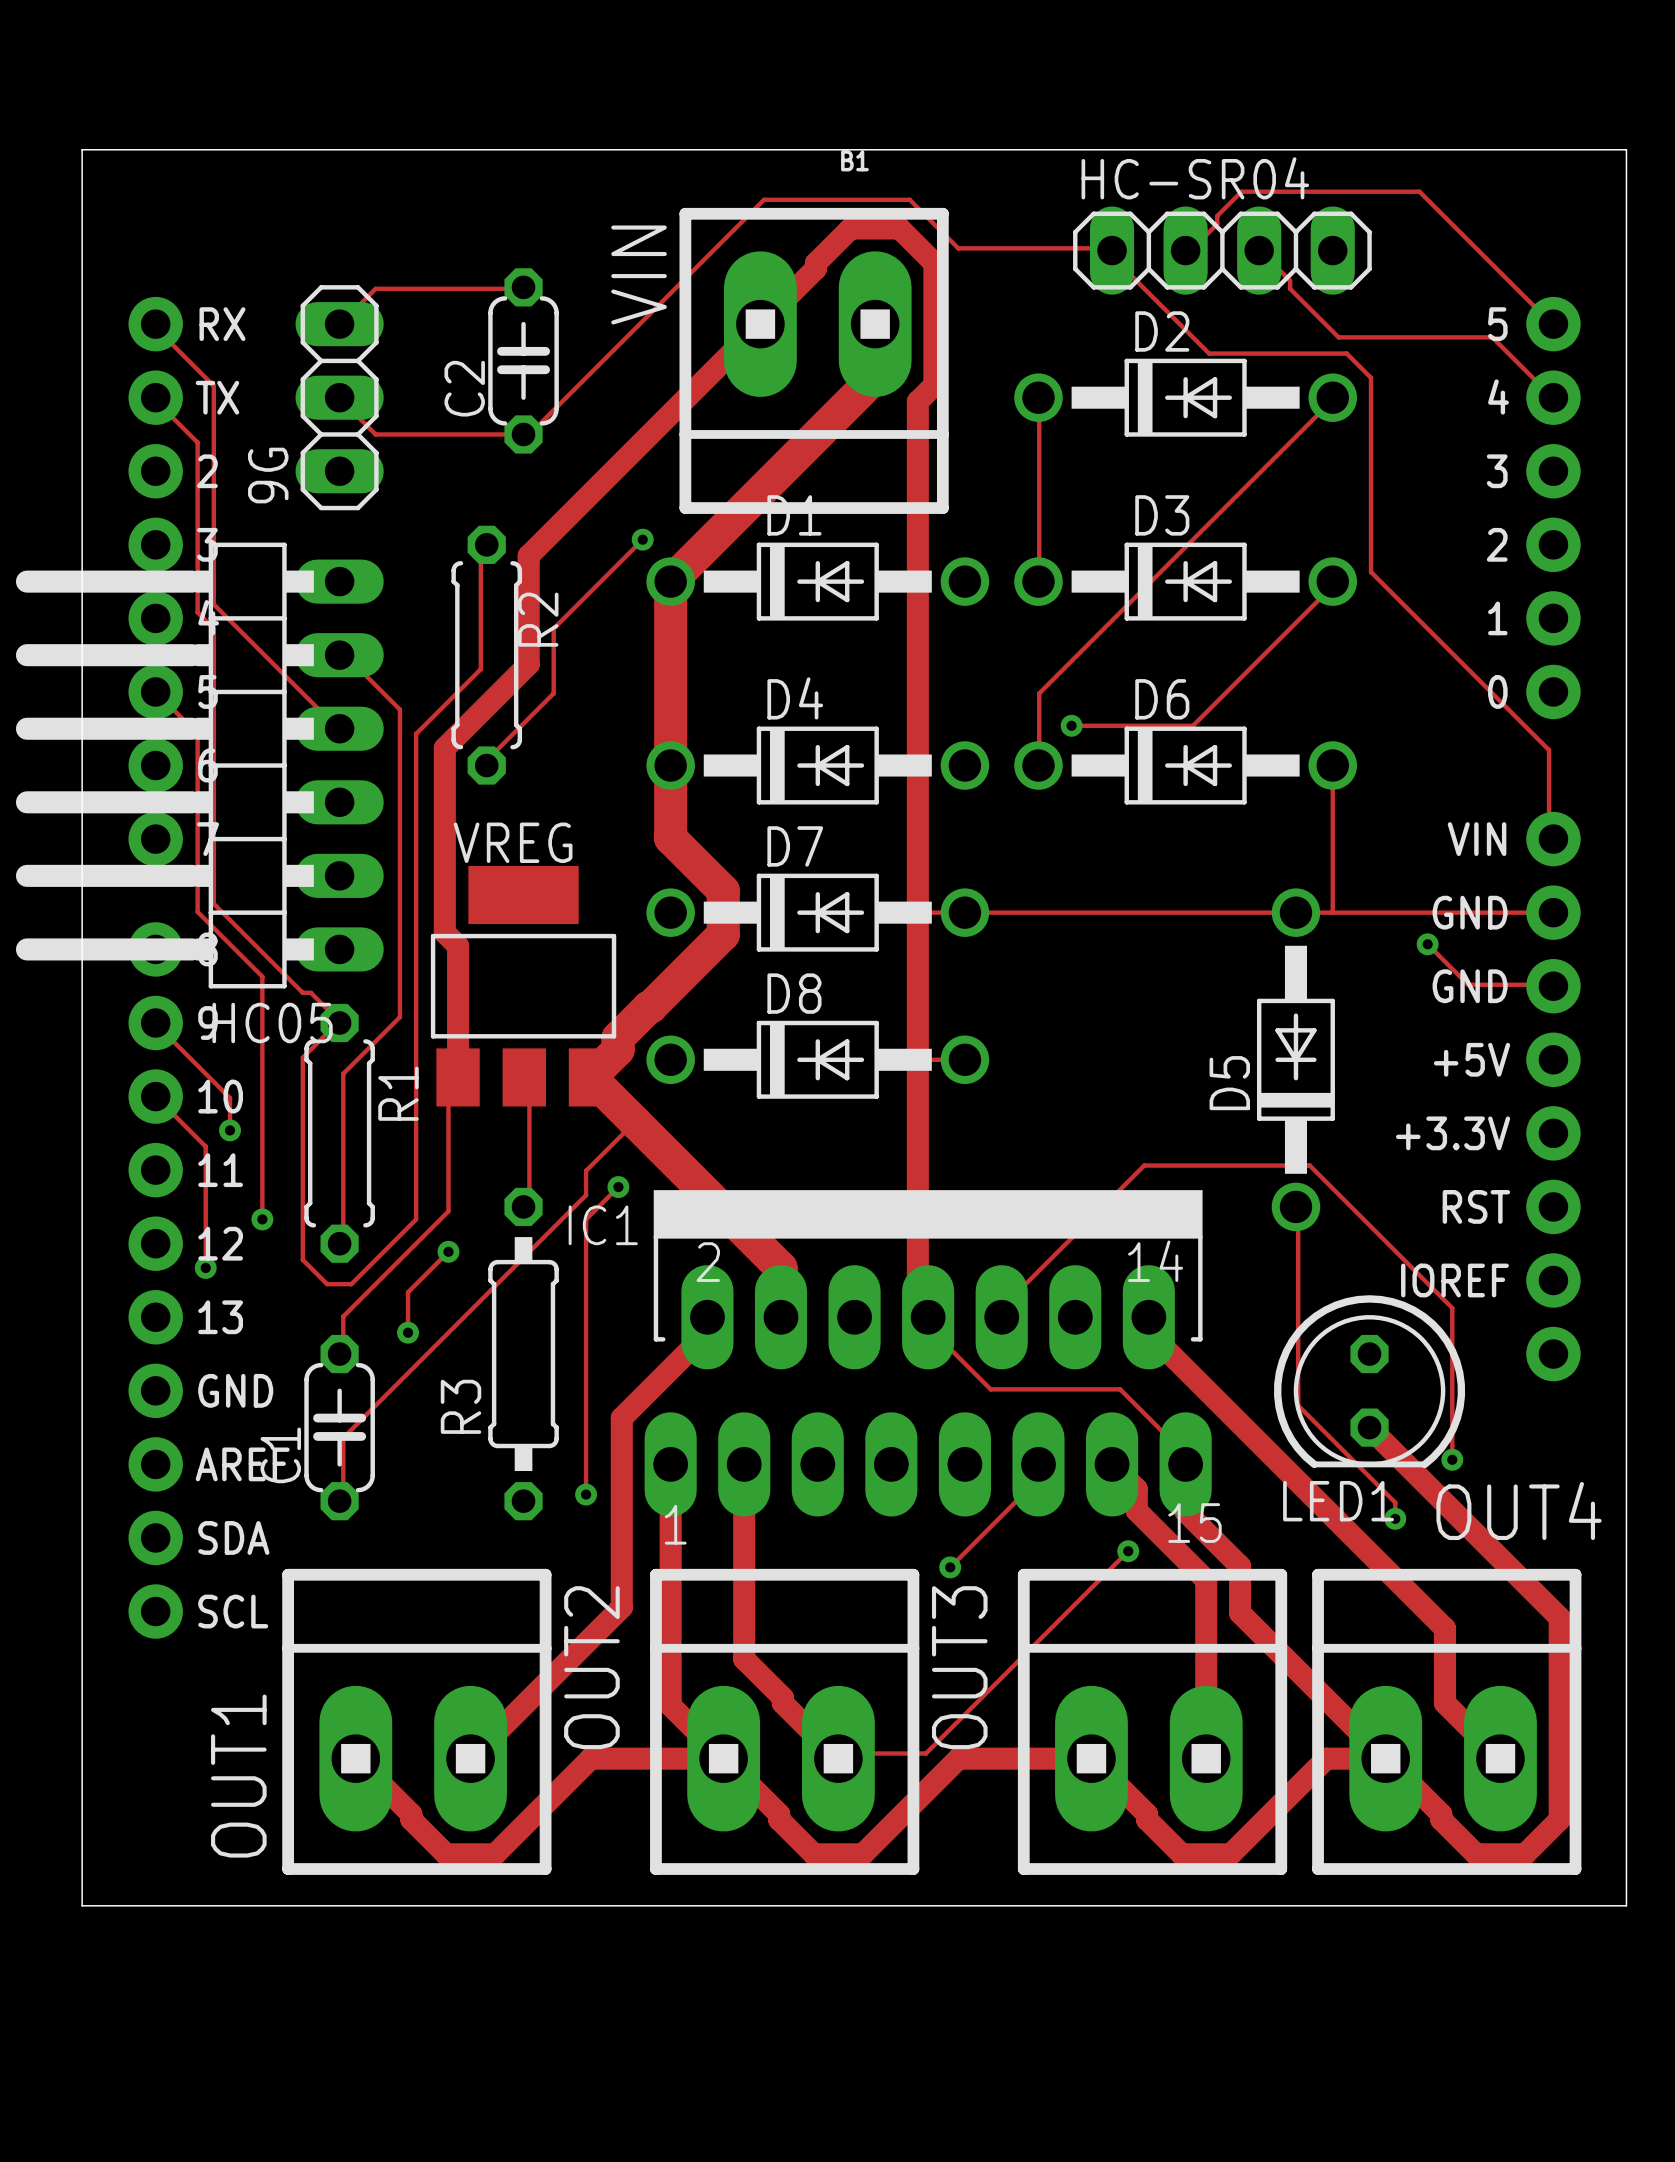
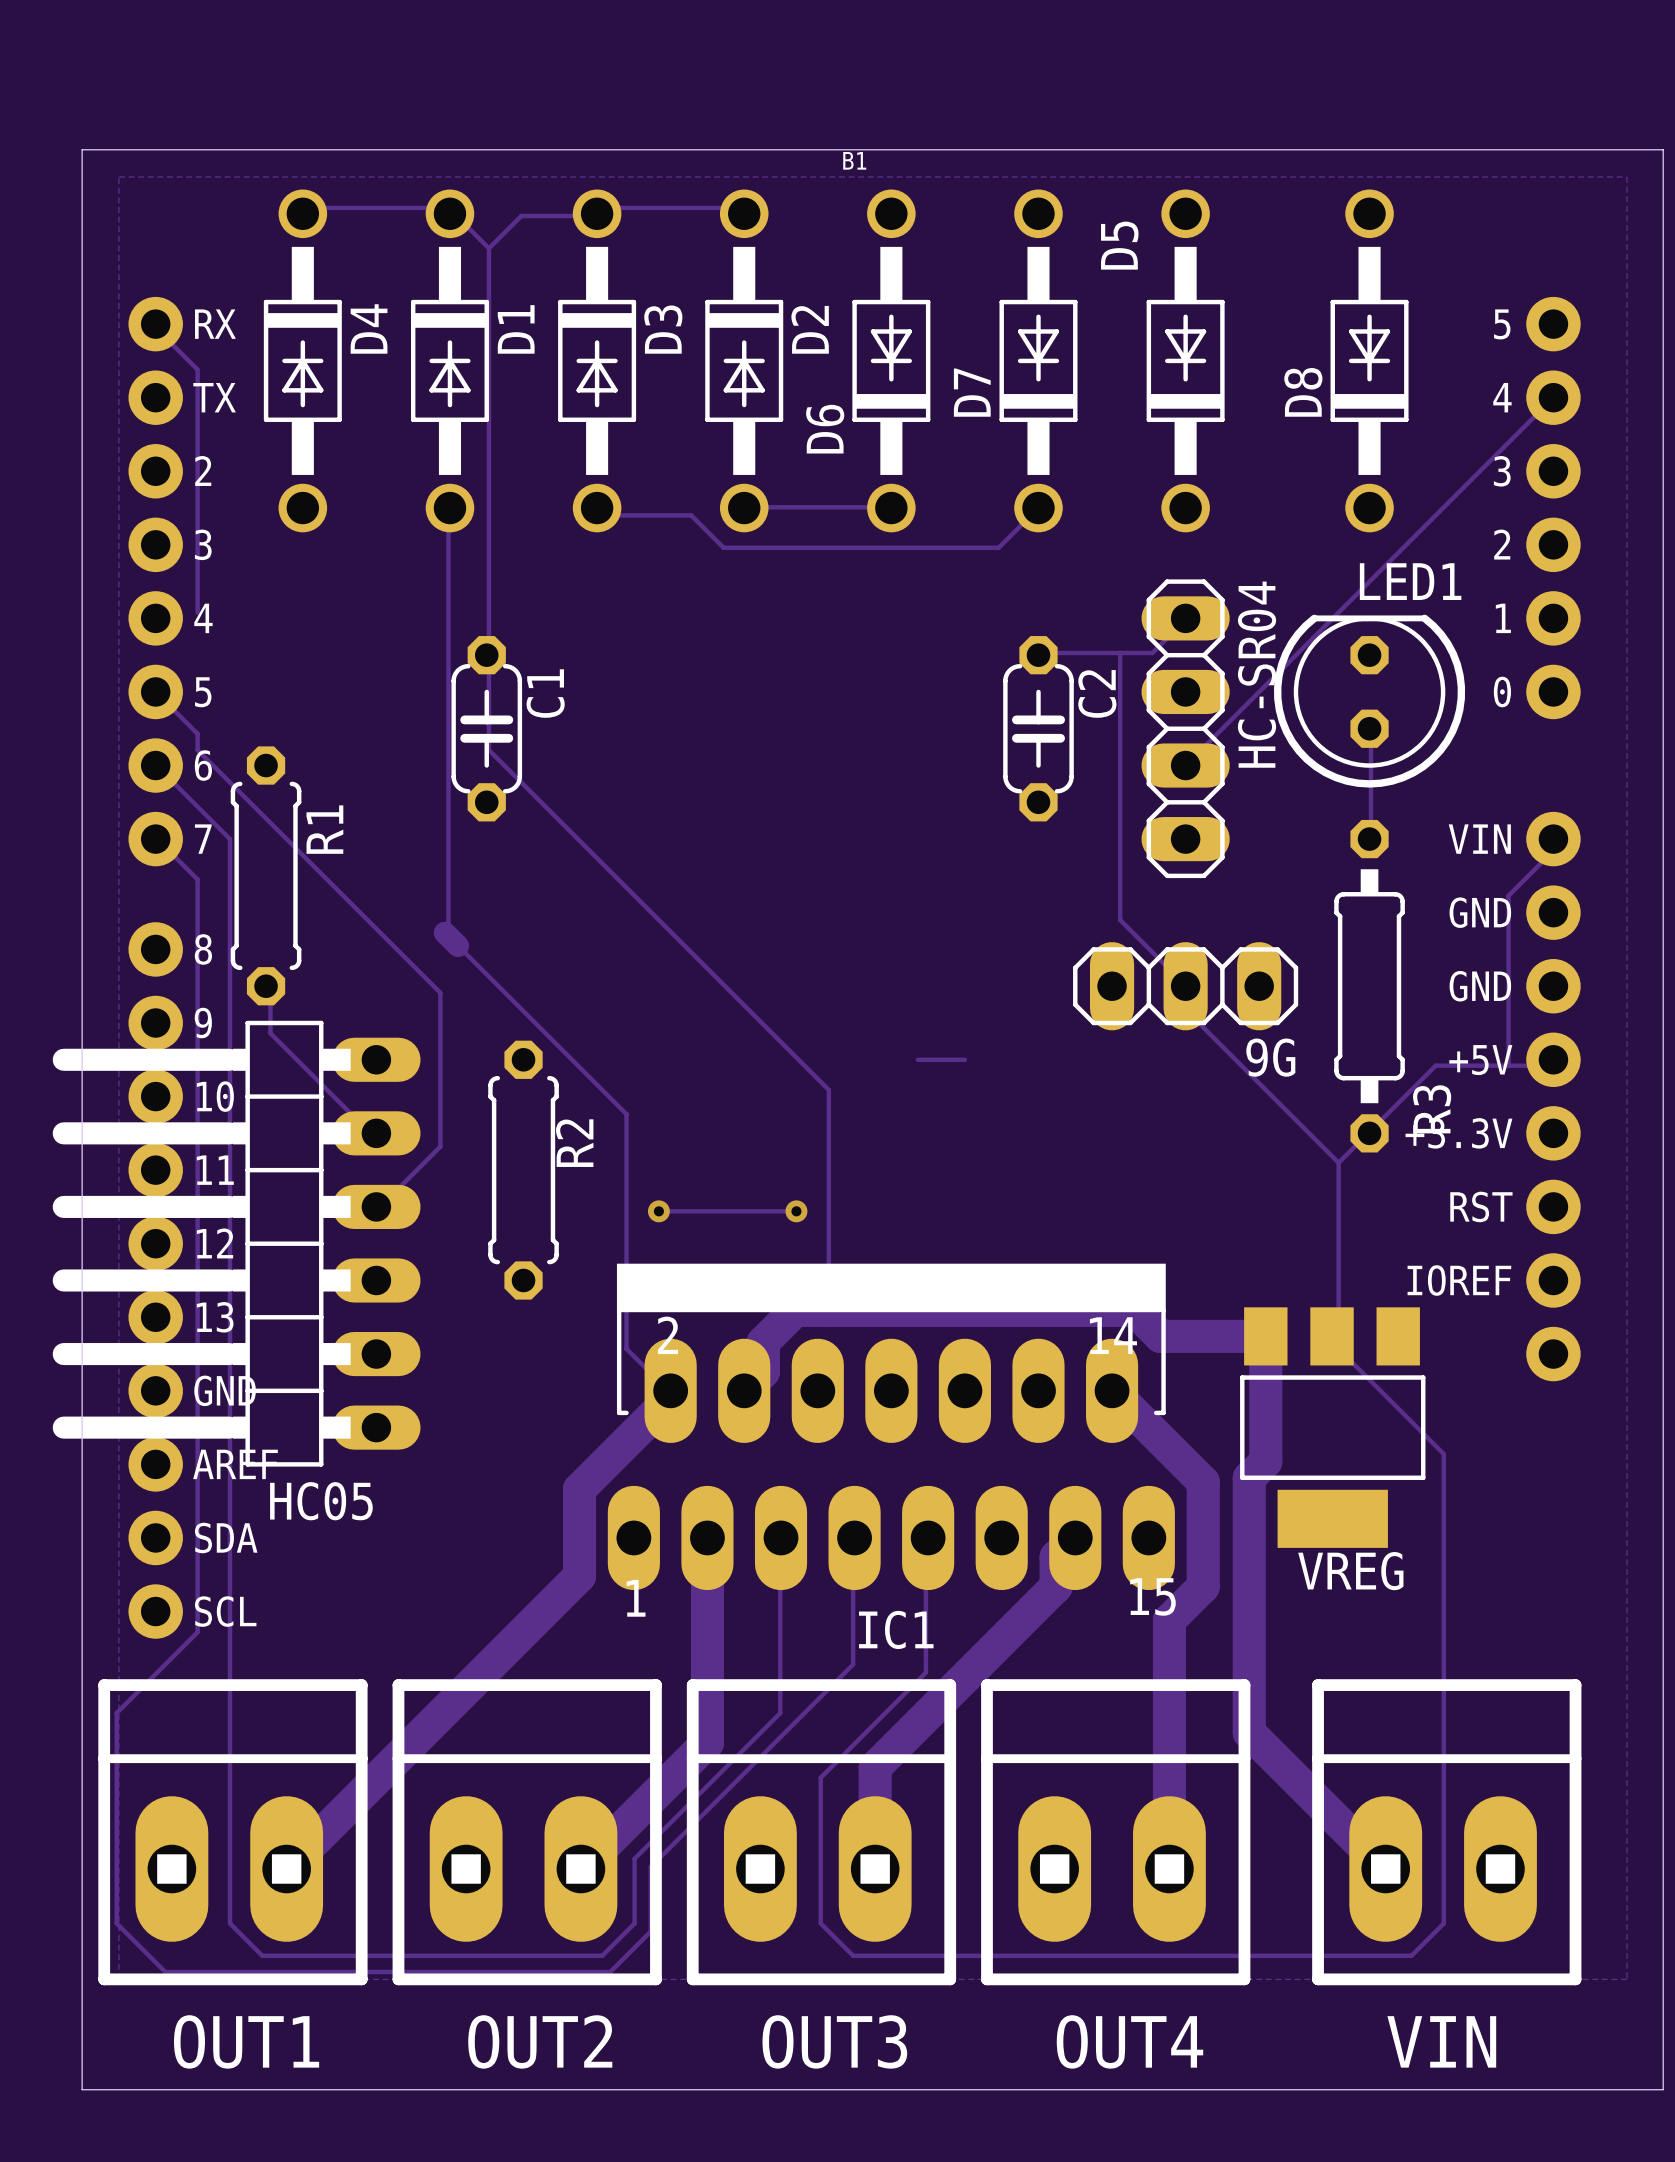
board edge: (1626, 149) (1626, 1905) (82, 1905) -> (1626, 149) (1663, 149) (1663, 2089) (82, 2089) (82, 1905)
zone outline: none -> (118, 177) (1627, 177) (1627, 1979) (118, 1979) (118, 177)
track: none -> (302, 213) (302, 207) (448, 207) (449, 213) (456, 215) (488, 248)
track: none -> (744, 213) (739, 207) (602, 207) (594, 215) (521, 215) (488, 248)
track: none -> (488, 248) (488, 652) (486, 655) (488, 661) (488, 750) (828, 1089) (828, 1310)
track: (1185, 250) (1192, 248) (1217, 224) (1217, 215) (1241, 191) (1419, 191) (1553, 324) -> none
HC-SR04 rotation: 0° (1222, 250) -> 90° clockwise (1185, 728)
HC-SR04 position: (1222, 250) -> (1185, 728)
track: (1259, 250) (1290, 280) (1290, 288) (1338, 337) (1492, 337) (1553, 397) -> (1185, 765) (1553, 397)
track: (523, 287) (375, 288) (339, 324) -> none
track: (875, 324) (875, 377) (670, 581) (670, 838) (723, 890) (723, 934) (618, 1038) (618, 1049) (590, 1077) (781, 1267) (781, 1317) -> none
C2 rotation: 0° (523, 360) -> 180° (1038, 728)
C2 position: (523, 360) -> (1038, 728)
VIN: (814, 360) -> none
track: (197, 369) (213, 385) (213, 604) (339, 728) -> none
track: (155, 397) (157, 402) (197, 442) -> (197, 369) (197, 442)
track: (339, 397) (375, 434) (529, 434) (764, 199) (909, 199) (958, 248) (1112, 248) (1112, 256) (1209, 353) (1346, 353) (1371, 377) (1371, 572) (1549, 750) (1549, 839) -> (1508, 1065) (1508, 895) (1549, 855) (1549, 839)
9G rotation: 0° (339, 397) -> 90° clockwise (1185, 986)
9G position: (339, 397) -> (1185, 986)
track: (1038, 397) (1038, 581) -> none
D2 rotation: 0° (1185, 397) -> 90° clockwise (744, 360)
D2 position: (1185, 397) -> (744, 360)
track: (1332, 397) (1330, 402) (1039, 693) (1038, 765) -> none
9G name position: 9G (268, 475) -> 9G (1270, 1057)
track: none -> (449, 508) (448, 936) (626, 1114) (626, 1348) (670, 1390) (670, 1398) (579, 1489) (579, 1576) (286, 1869)
track: none -> (597, 508) (602, 515) (691, 515) (723, 547) (998, 547) (1038, 508)
track: none -> (744, 508) (891, 508)
track: (642, 539) (553, 628) (553, 693) (488, 758) (486, 765) -> none
via: (642, 539) -> none
track: (486, 544) (480, 547) (480, 669) (416, 733) (416, 1219) (351, 1284) (327, 1284) (302, 1259) (302, 1057) (339, 1023) (310, 992) (302, 992) (213, 903) (213, 628) (197, 612) -> none
D1 rotation: 0° (817, 581) -> 90° clockwise (449, 360)
D1 position: (817, 581) -> (449, 360)
D3 rotation: 0° (1185, 581) -> 90° clockwise (597, 360)
D3 position: (1185, 581) -> (597, 360)
track: (1332, 581) (1330, 588) (1192, 725) (1071, 725) -> none
track: none -> (1185, 618) (1152, 652) (1039, 652) (1038, 655)
track: none -> (1120, 652) (1120, 920) (1192, 992) (1192, 1017) (1338, 1162)
track: (339, 655) (343, 652) (399, 709) (399, 1017) (343, 1073) (343, 1243) (339, 1243) -> none
R2 position: (486, 655) -> (523, 1170)
via: (1071, 725) -> none
track: none -> (1369, 728) (1369, 839)
track: (197, 750) (197, 879) -> (155, 839) (197, 879)
track: none -> (197, 750) (440, 992) (440, 1146) (383, 1203) (376, 1206)
HC05 position: (199, 765) -> (236, 1243)
D4 rotation: 0° (817, 765) -> 90° clockwise (302, 360)
D4 position: (817, 765) -> (302, 360)
D6 rotation: 0° (1185, 765) -> 90° counterclockwise (891, 360)
D6 position: (1185, 765) -> (891, 360)
track: (1332, 765) (1332, 912) -> none
track: (197, 911) (262, 976) (262, 1219) -> (197, 911) (197, 1632) (116, 1713) (116, 1923) (165, 1972) (610, 1972) (650, 1931) (650, 1866) (853, 1664) (854, 1537)
D7 rotation: 0° (817, 912) -> 90° counterclockwise (1038, 360)
D7 position: (817, 912) -> (1038, 360)
track: (917, 912) (1553, 912) -> none
track: (444, 932) (444, 748) (528, 664) (528, 555) (815, 268) (815, 263) (850, 228) (899, 228) (934, 263) (934, 385) (917, 401) (917, 1306) (928, 1317) (925, 1324) (990, 1389) (1120, 1389) (1184, 1454) (1185, 1511) (1240, 1566) (1240, 1613) (1441, 1814) (1441, 1819) (1475, 1854) (1525, 1854) (1559, 1819) (1559, 1617) (1369, 1427) -> none
track: (1427, 944) (1468, 984) (1553, 986) -> none
via: (1427, 944) -> none
track: (458, 946) (458, 1077) (448, 1081) (448, 1211) (343, 1316) (343, 1348) (339, 1354) -> none
track: none -> (266, 986) (270, 992) (270, 1033) (375, 1138) (376, 1133)
VREG: (523, 986) -> none
track: (155, 1023) (230, 1098) -> (155, 765) (230, 839) (230, 1098)
D8 rotation: 0° (817, 1059) -> 90° counterclockwise (1369, 360)
D8 position: (817, 1059) -> (1369, 360)
D5 position: (1295, 1059) -> (1185, 360)
track: none -> (1553, 1059) (1549, 1065) (1435, 1065) (1338, 1162)
track: (524, 1077) (529, 1081) (529, 1203) (523, 1206) -> none
D5 name position: D5 (1229, 1083) -> D5 (1119, 245)
track: (155, 1096) (205, 1146) (205, 1267) -> none
track: (634, 1121) (586, 1170) (586, 1195) (343, 1437) (343, 1494) (339, 1501) -> none
track: none -> (230, 1130) (230, 1923) (262, 1955) (602, 1955) (634, 1923) (634, 1858) (780, 1713) (781, 1537)
via: (230, 1130) -> none
R1 position: (339, 1133) -> (266, 875)
track: none -> (1338, 1162) (1338, 1332) (1332, 1336) (1330, 1340) (1443, 1454) (1443, 1923) (1411, 1955) (853, 1955) (820, 1923) (820, 1777) (925, 1672) (925, 1543) (928, 1537)
track: (618, 1187) (586, 1219) (586, 1494) -> none
via position: (618, 1187) -> (658, 1211)
track: (1295, 1206) (1298, 1211) (1298, 1405) (1395, 1502) (1395, 1518) -> none
track: none -> (658, 1211) (796, 1211)
via: none -> (796, 1211)
via: (262, 1219) -> none
IC1 name position: IC1 (603, 1225) -> IC1 (896, 1629)
track: (448, 1251) (408, 1292) (408, 1332) -> none
via: (448, 1251) -> none
via: (205, 1267) -> none
track: (707, 1317) (707, 1332) (621, 1418) (621, 1607) (470, 1758) -> none
track: (1001, 1317) (1001, 1308) (1144, 1165) (1309, 1165) (1452, 1308) (1452, 1459) -> none
track: (1148, 1317) (1148, 1332) (1444, 1628) (1444, 1703) (1500, 1758) -> none
via: (408, 1332) -> none
IC1 position: (928, 1353) -> (891, 1426)
R3 position: (523, 1354) -> (1369, 986)
LED1 rotation: 0° (1369, 1381) -> 180° (1369, 701)
LED1 position: (1369, 1381) -> (1369, 701)
track: none -> (744, 1390) (763, 1371) (763, 1342) (795, 1310) (1134, 1310) (1160, 1336) (1265, 1336) (1265, 1461) (1249, 1478) (1249, 1732) (1385, 1869)
track: none -> (1112, 1390) (1203, 1482) (1203, 1586) (1169, 1620) (1169, 1869)
R3 name position: R3 (461, 1406) -> R3 (1432, 1109)
C1 rotation: 0° (339, 1427) -> 180° (486, 728)
C1 position: (339, 1427) -> (486, 728)
VREG: none -> (1332, 1427)
via: (1452, 1459) -> none
track: (670, 1464) (670, 1705) (779, 1814) (779, 1819) (813, 1854) (862, 1854) (958, 1758) (1091, 1758) (1147, 1814) (1147, 1819) (1181, 1854) (1230, 1854) (1326, 1758) (1385, 1758) -> none
track: (744, 1464) (744, 1659) (782, 1697) (782, 1703) (838, 1758) (845, 1753) (925, 1753) (1128, 1551) -> none
track: (1038, 1464) (1031, 1470) (1031, 1486) (950, 1567) -> none
track: (1112, 1464) (1136, 1489) (1136, 1510) (1206, 1580) (1206, 1758) -> none
via: (586, 1494) -> none
OUT4 name position: OUT4 (1519, 1510) -> OUT4 (1129, 2041)
via: (1395, 1518) -> none
track: none -> (707, 1537) (707, 1742) (580, 1869)
track: none -> (1075, 1537) (1056, 1557) (1056, 1586) (875, 1767) (875, 1869)
via: (1128, 1551) -> none
via: (950, 1567) -> none
OUT2 name rotation: 0° (591, 1667) -> 90° clockwise (540, 2041)
OUT2 name position: OUT2 (591, 1667) -> OUT2 (540, 2041)
OUT3 name rotation: 0° (959, 1667) -> 90° clockwise (834, 2041)
OUT3 name position: OUT3 (959, 1667) -> OUT3 (834, 2041)
OUT1 position: (416, 1721) -> (232, 1832)
OUT2 position: (784, 1721) -> (527, 1832)
OUT3 position: (1152, 1721) -> (821, 1832)
OUT4 position: (1446, 1721) -> (1115, 1832)
track: (355, 1758) (411, 1814) (411, 1819) (446, 1854) (495, 1854) (590, 1758) (723, 1758) -> none
OUT1 name rotation: 0° (238, 1776) -> 90° clockwise (246, 2041)
OUT1 name position: OUT1 (238, 1776) -> OUT1 (246, 2041)
VIN: none -> (1446, 1832)

